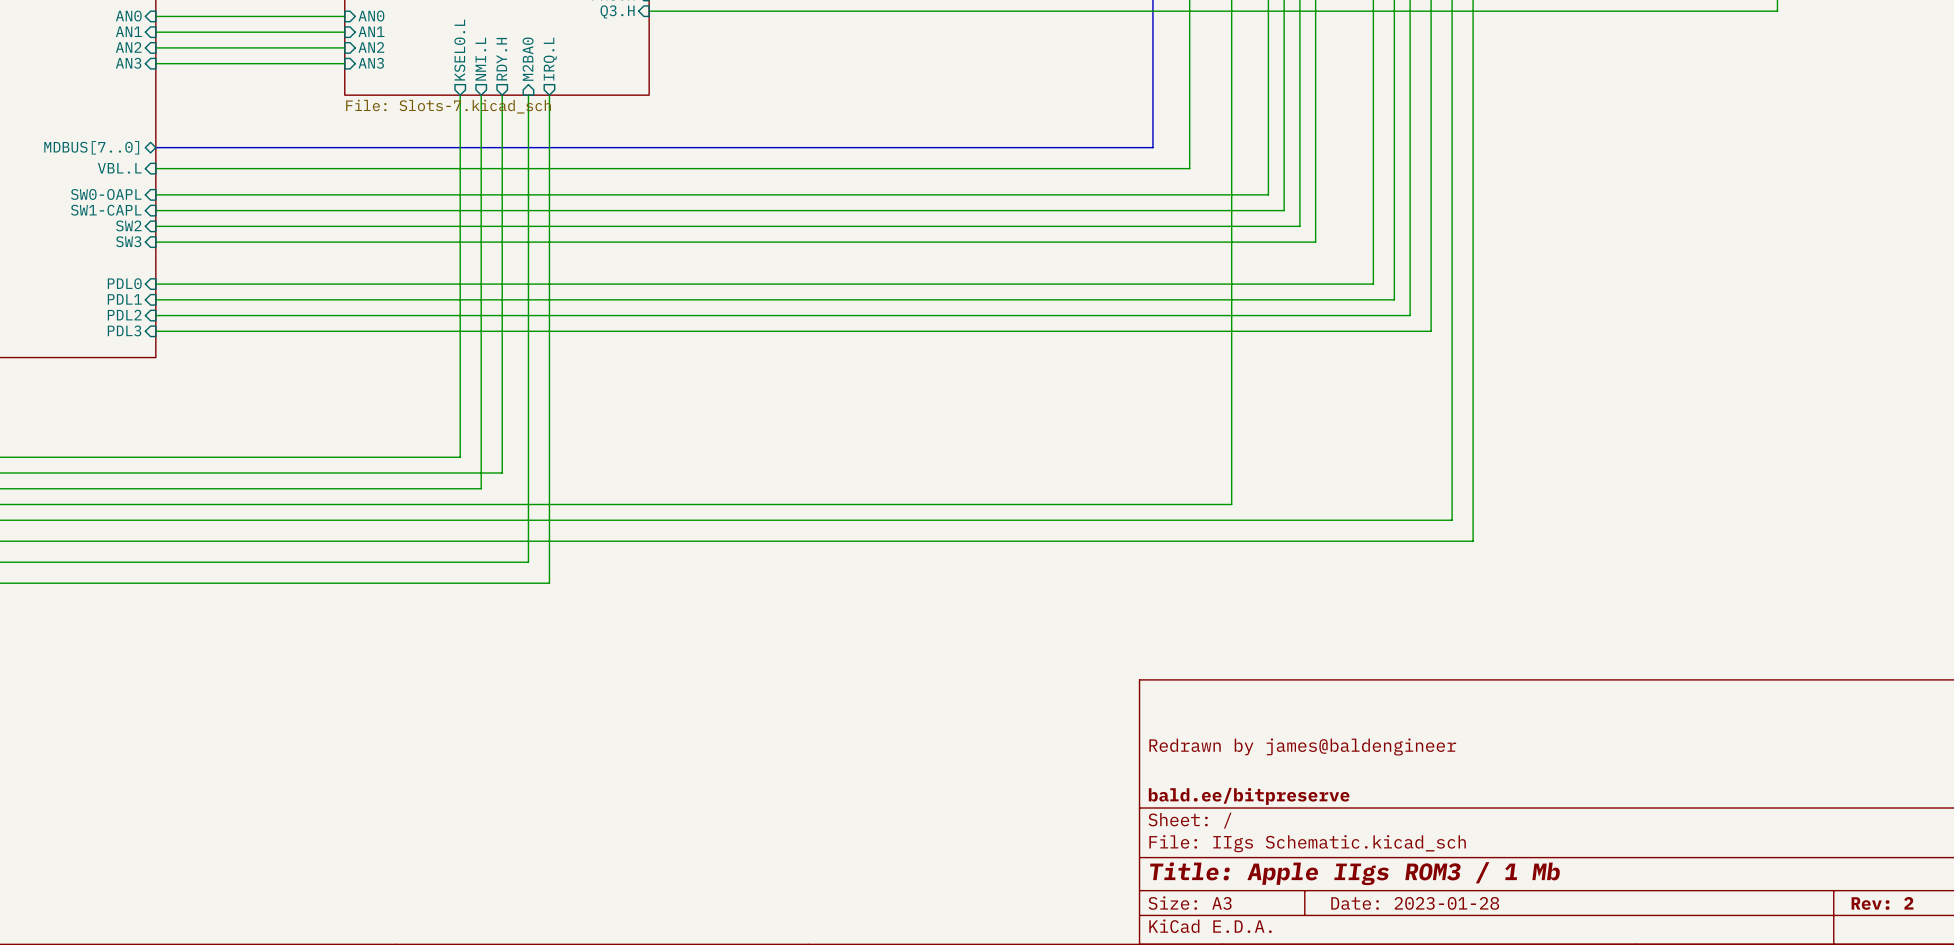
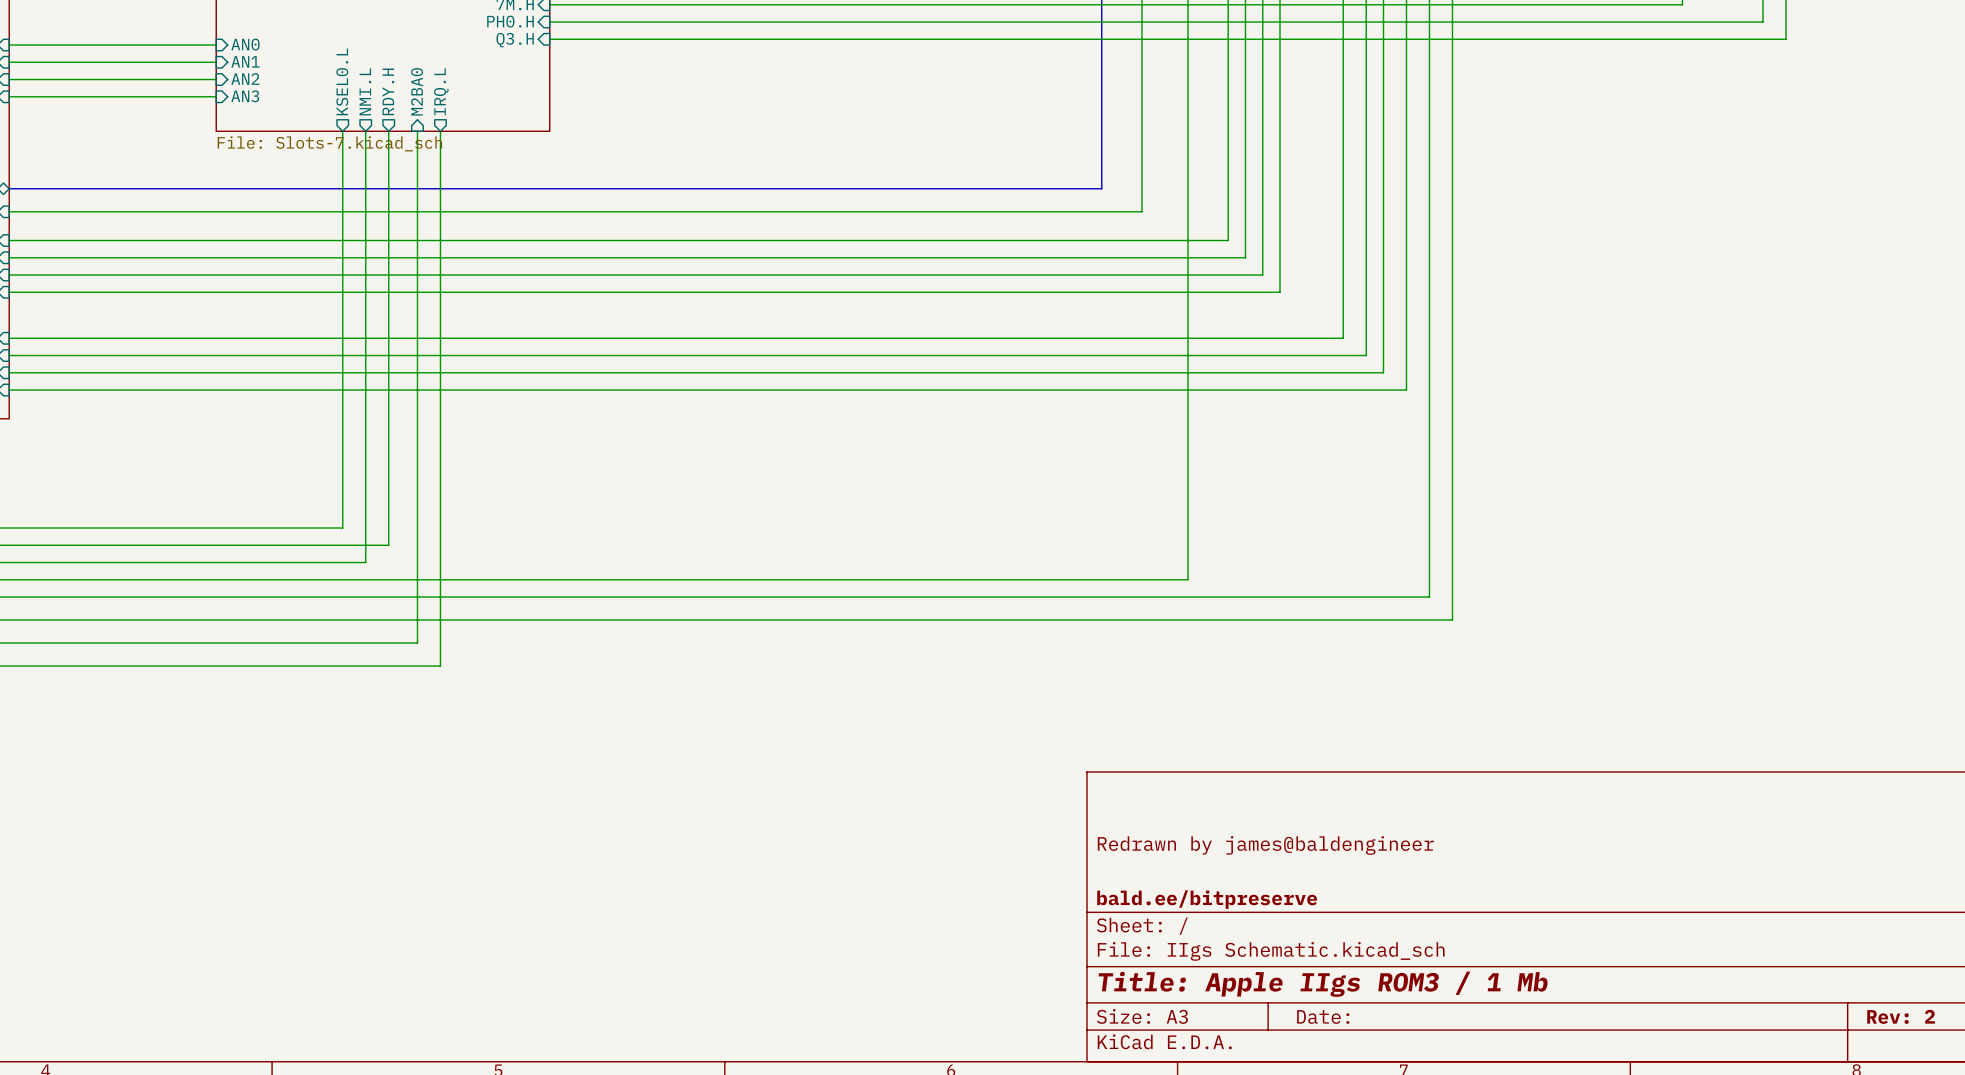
title block: Date: 2023-01-28 (1415, 903) -> Date: (1323, 1016)

